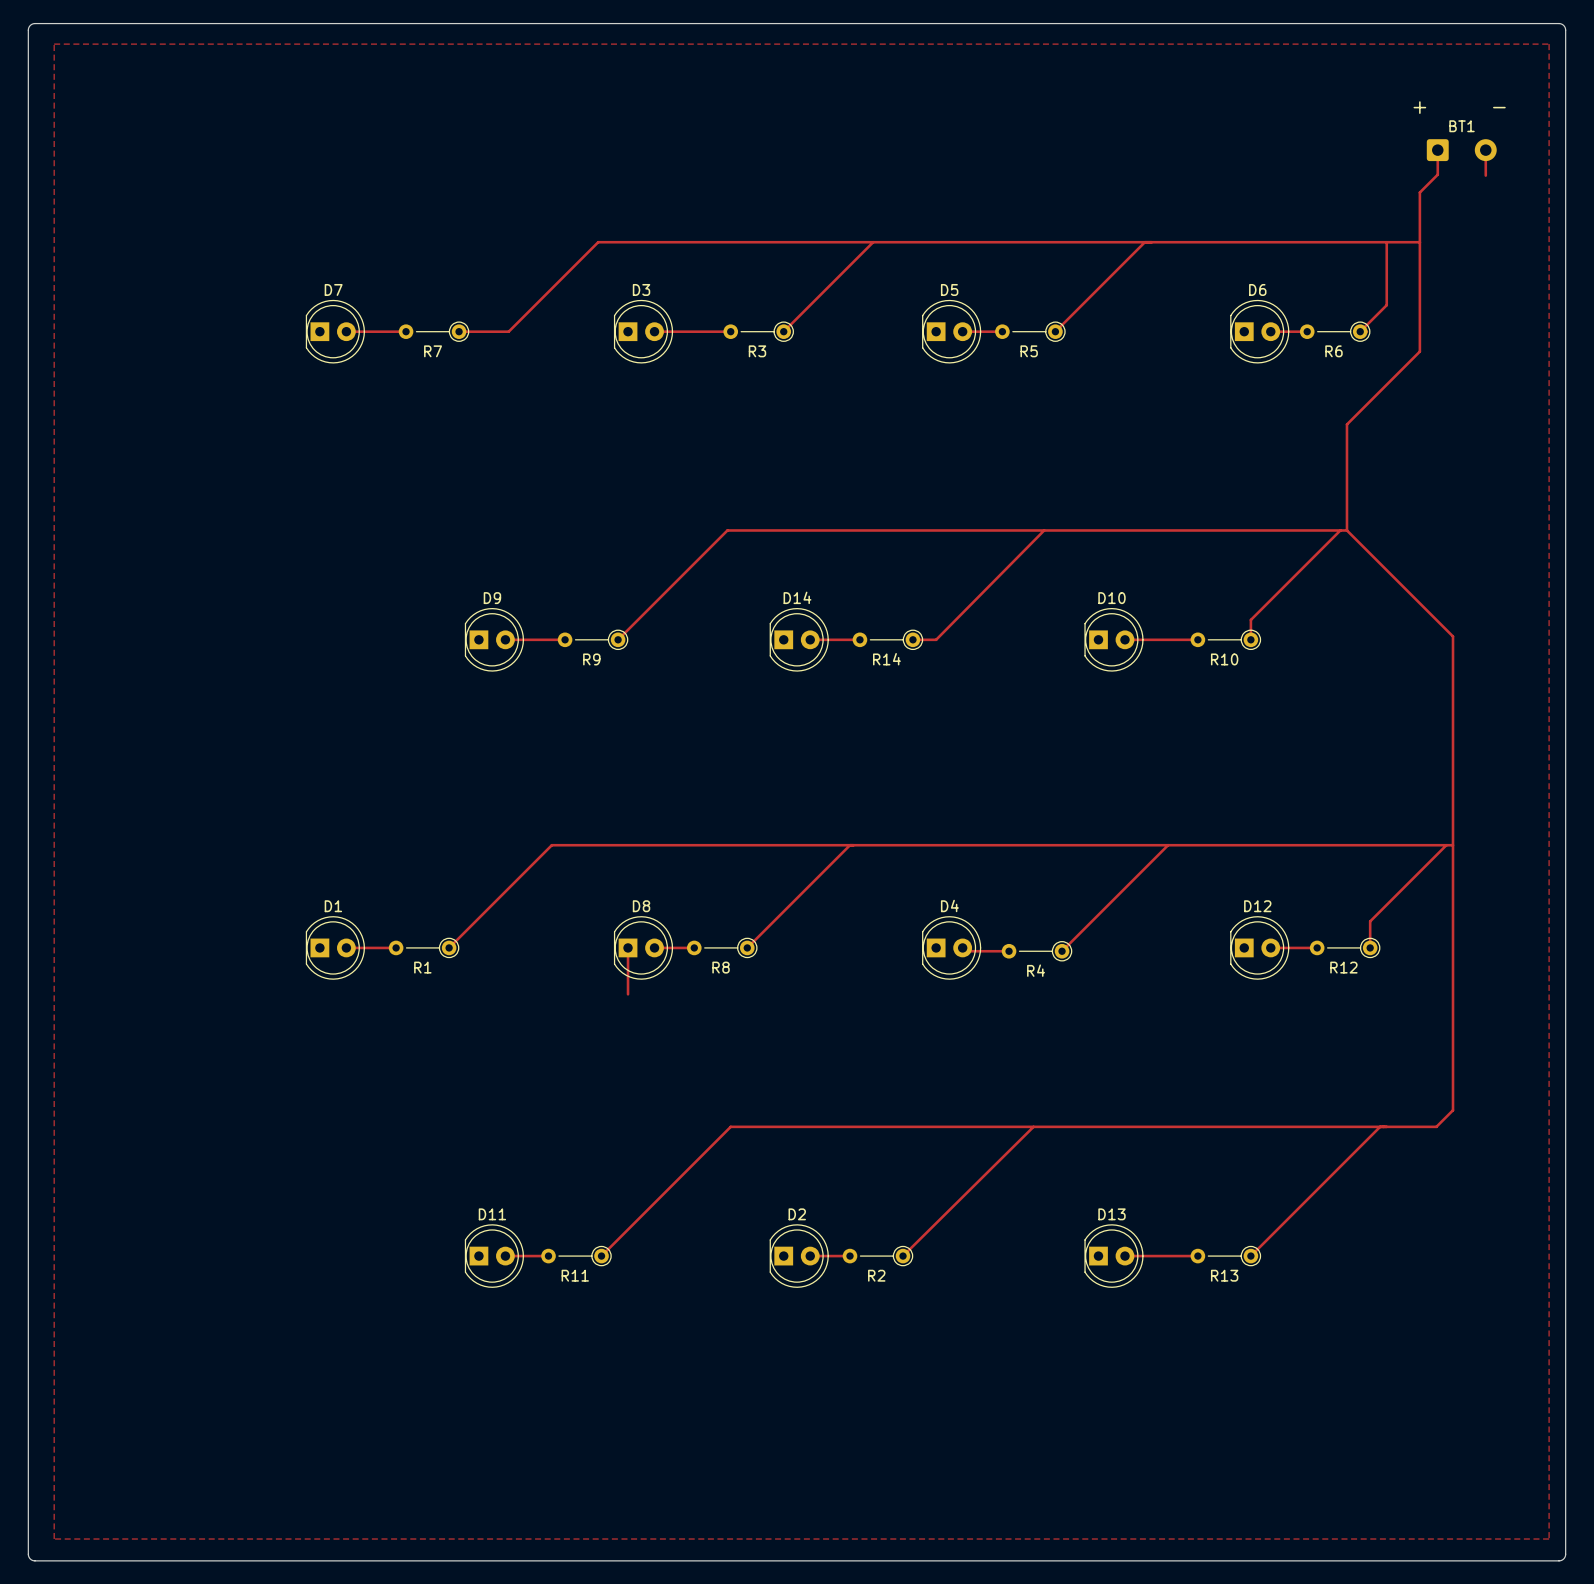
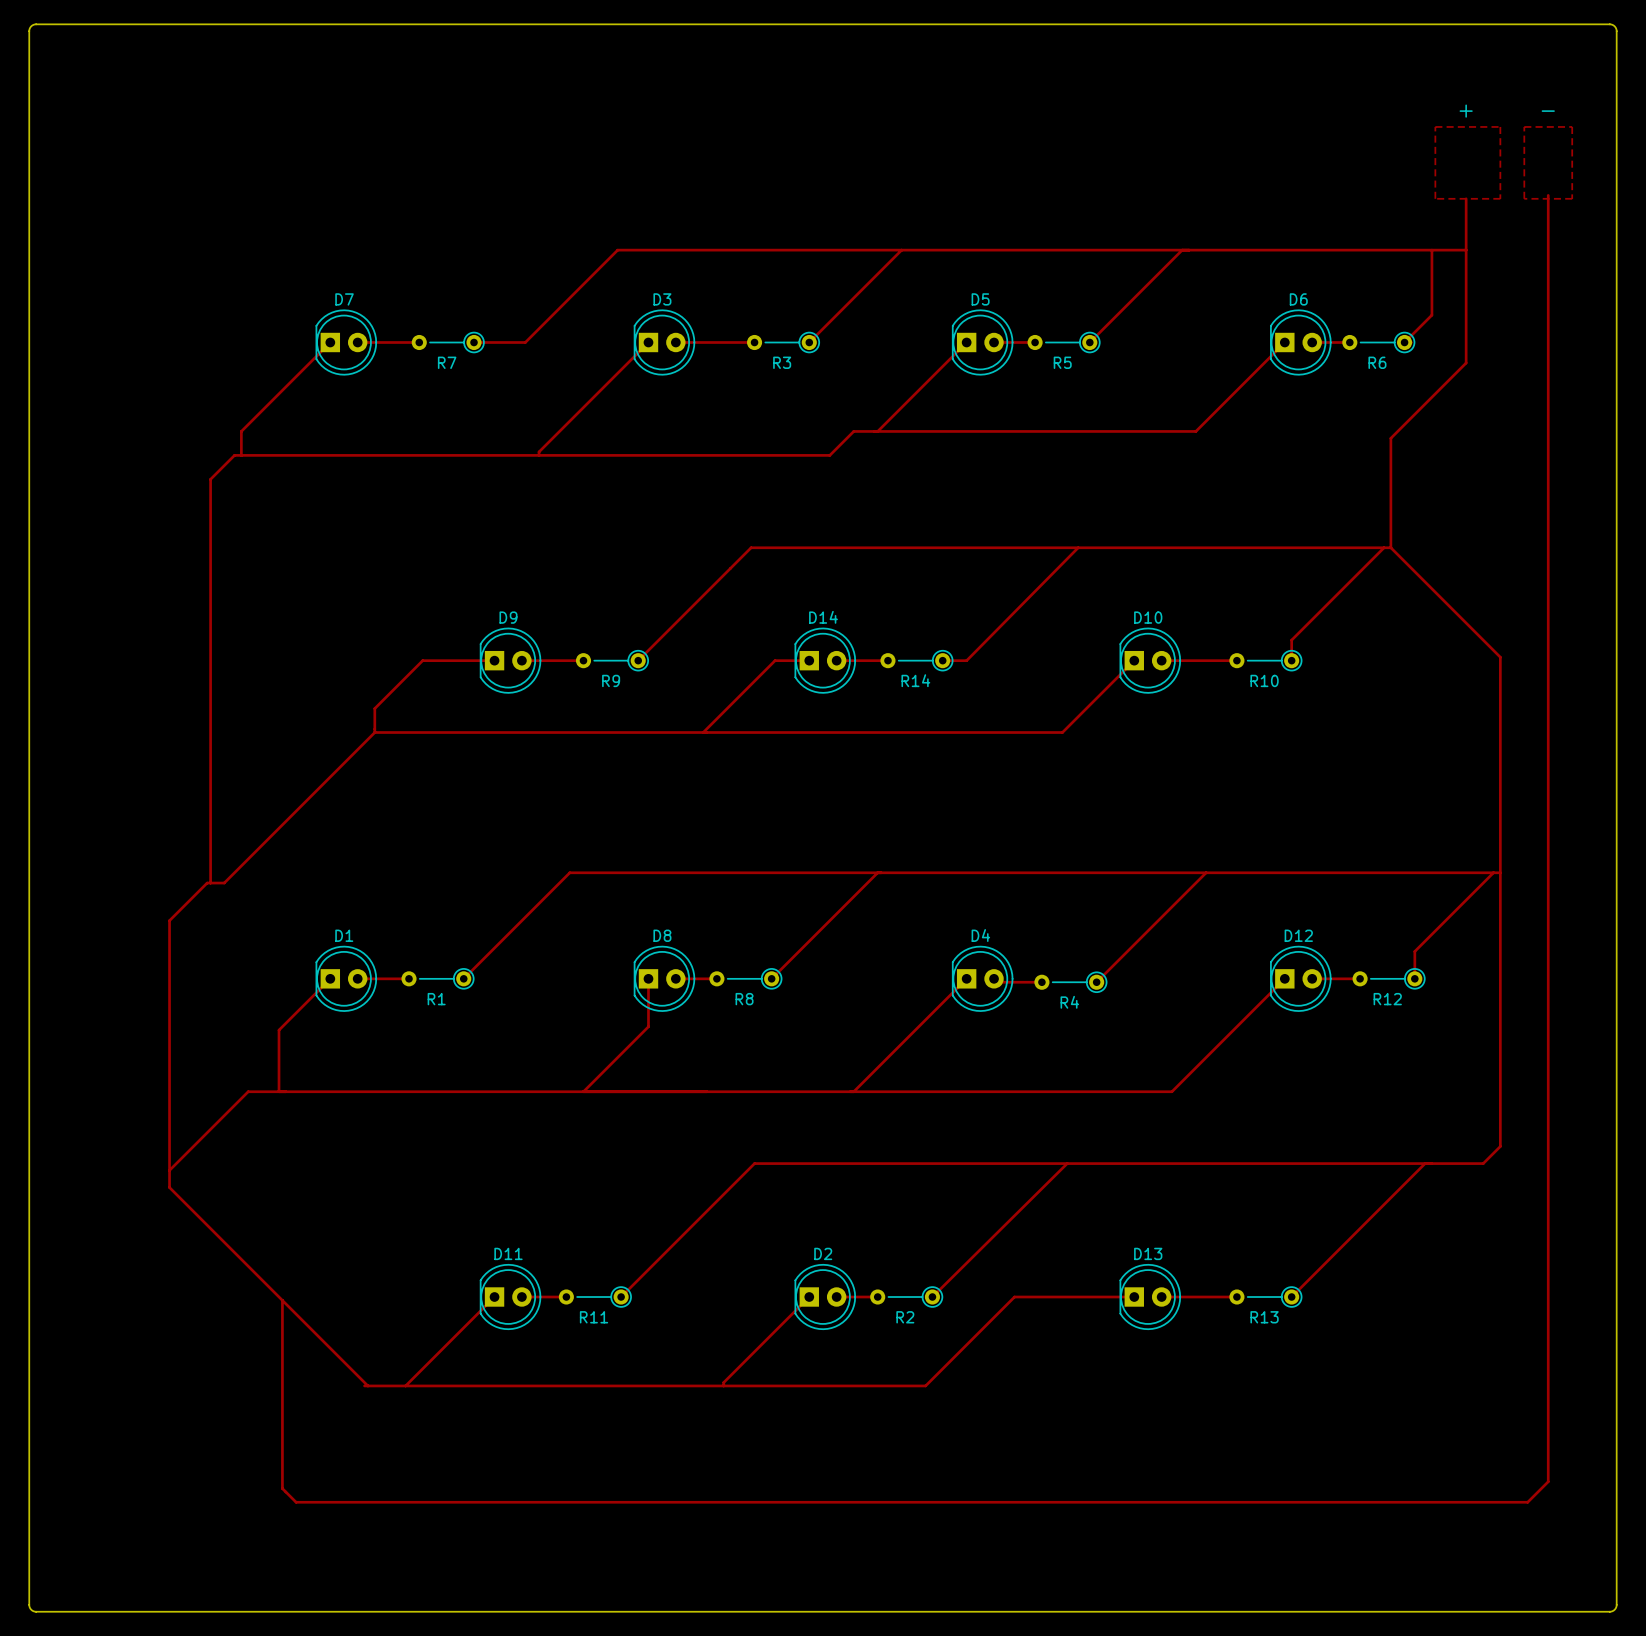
top zone outline: (54, 44) (54, 1539) (1549, 1539) (1549, 44) (54, 44) -> none
top zone outline: none -> (1435, 126) (1435, 198) (1500, 198) (1500, 126) (1435, 126)
top zone outline: none -> (1524, 126) (1572, 126) (1572, 198) (1524, 198) (1524, 126)
top track: (1437, 150) (1437, 174) (1419, 192) -> none
BT1: (1461, 150) -> none
top track: (1485, 150) (1485, 175) -> none
top track: none -> (1548, 195) (1548, 1481) (1527, 1502) (296, 1502) (282, 1488) (282, 1300)
top track: none -> (330, 342) (241, 431) (241, 455)
top track: none -> (648, 342) (539, 451) (539, 455)
top track: none -> (966, 342) (877, 431)
top track: none -> (1284, 342) (1195, 431) (853, 431) (829, 455) (234, 455) (210, 479) (210, 883)
top track: none -> (494, 660) (422, 660) (374, 708) (374, 732)
top track: none -> (809, 660) (775, 660) (703, 732)
top track: none -> (1134, 660) (1062, 732) (374, 732)
top track: none -> (374, 732) (224, 883) (207, 883) (169, 920) (169, 1187) (367, 1385)
top track: none -> (330, 978) (279, 1030) (279, 1091)
top track: none -> (966, 978) (853, 1091)
top track: none -> (1284, 978) (1171, 1091) (248, 1091) (169, 1170)
top track: none -> (648, 1026) (583, 1091)
top track: none -> (494, 1297) (405, 1385)
top track: none -> (809, 1297) (723, 1382) (723, 1385)
top track: none -> (1134, 1297) (1014, 1297) (925, 1385) (364, 1385)

